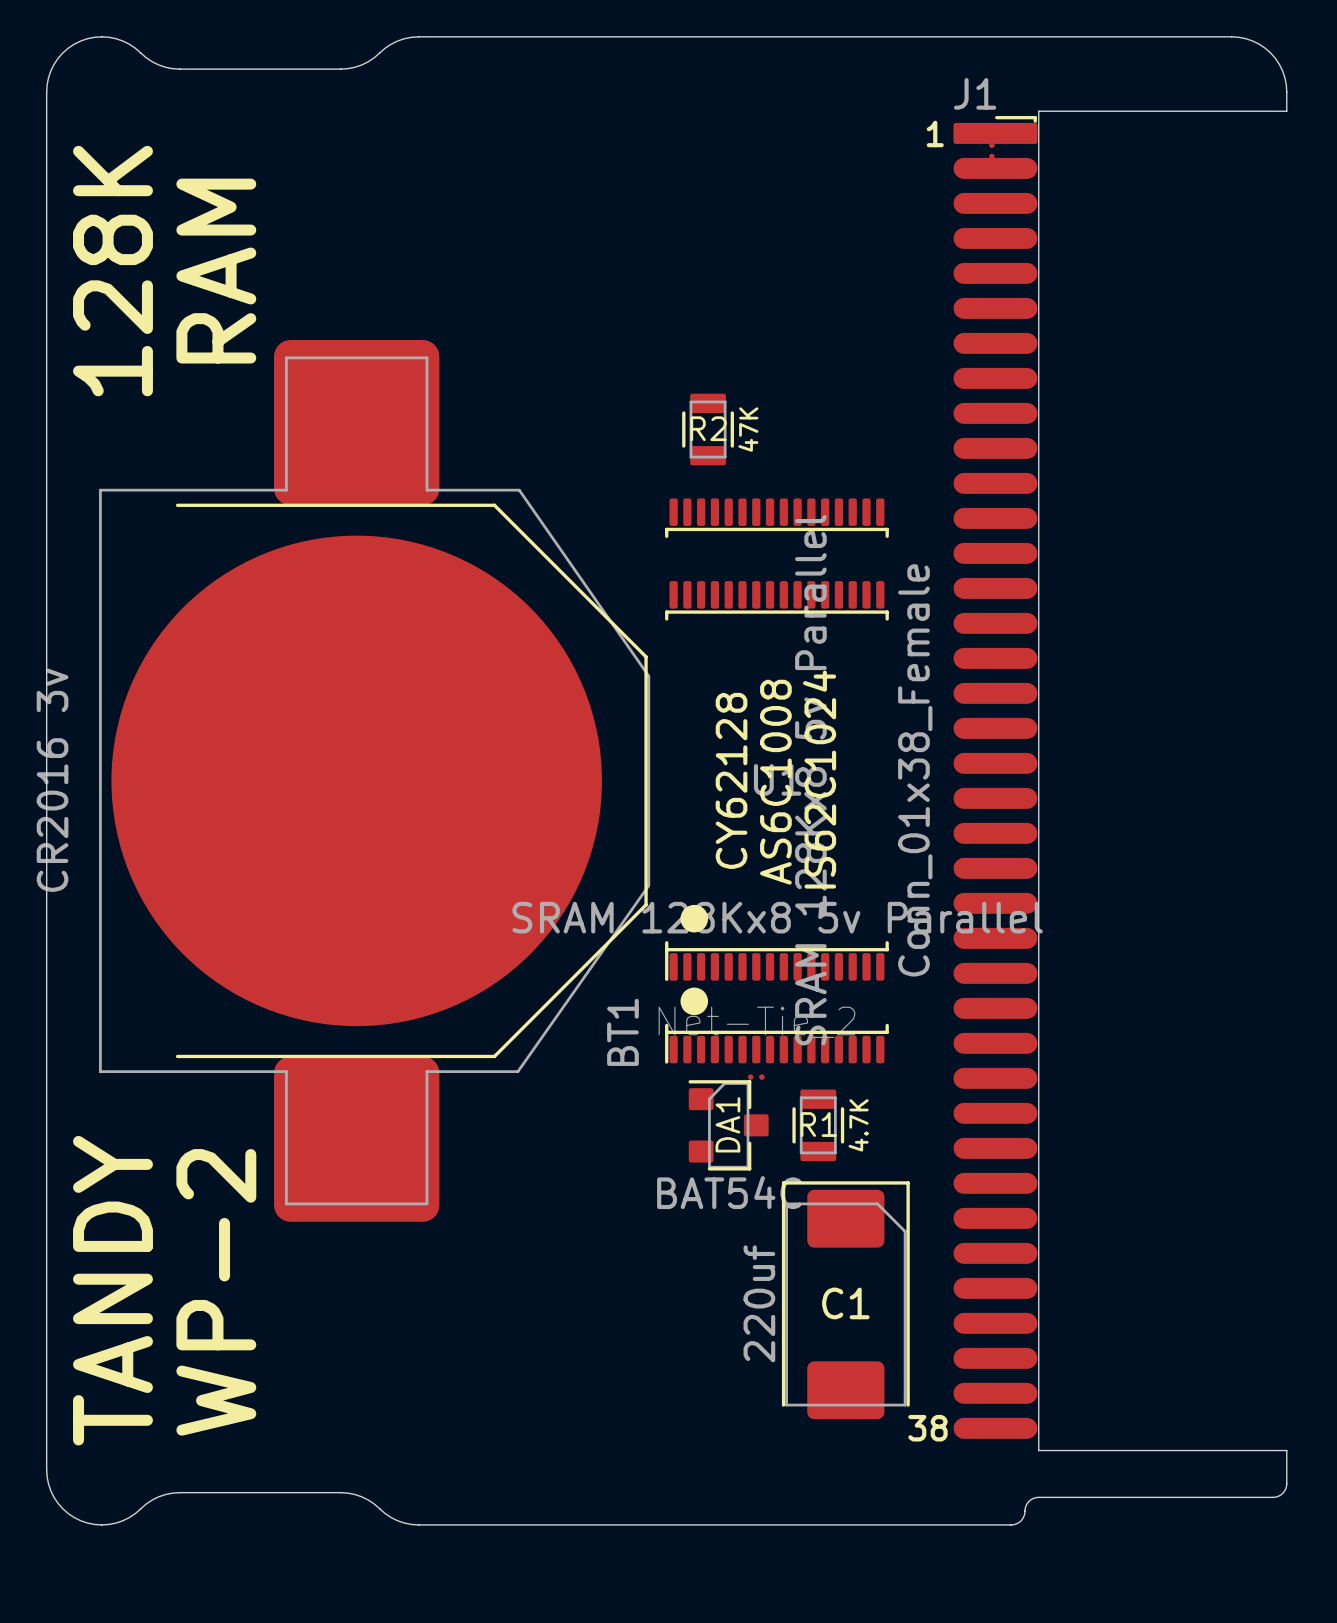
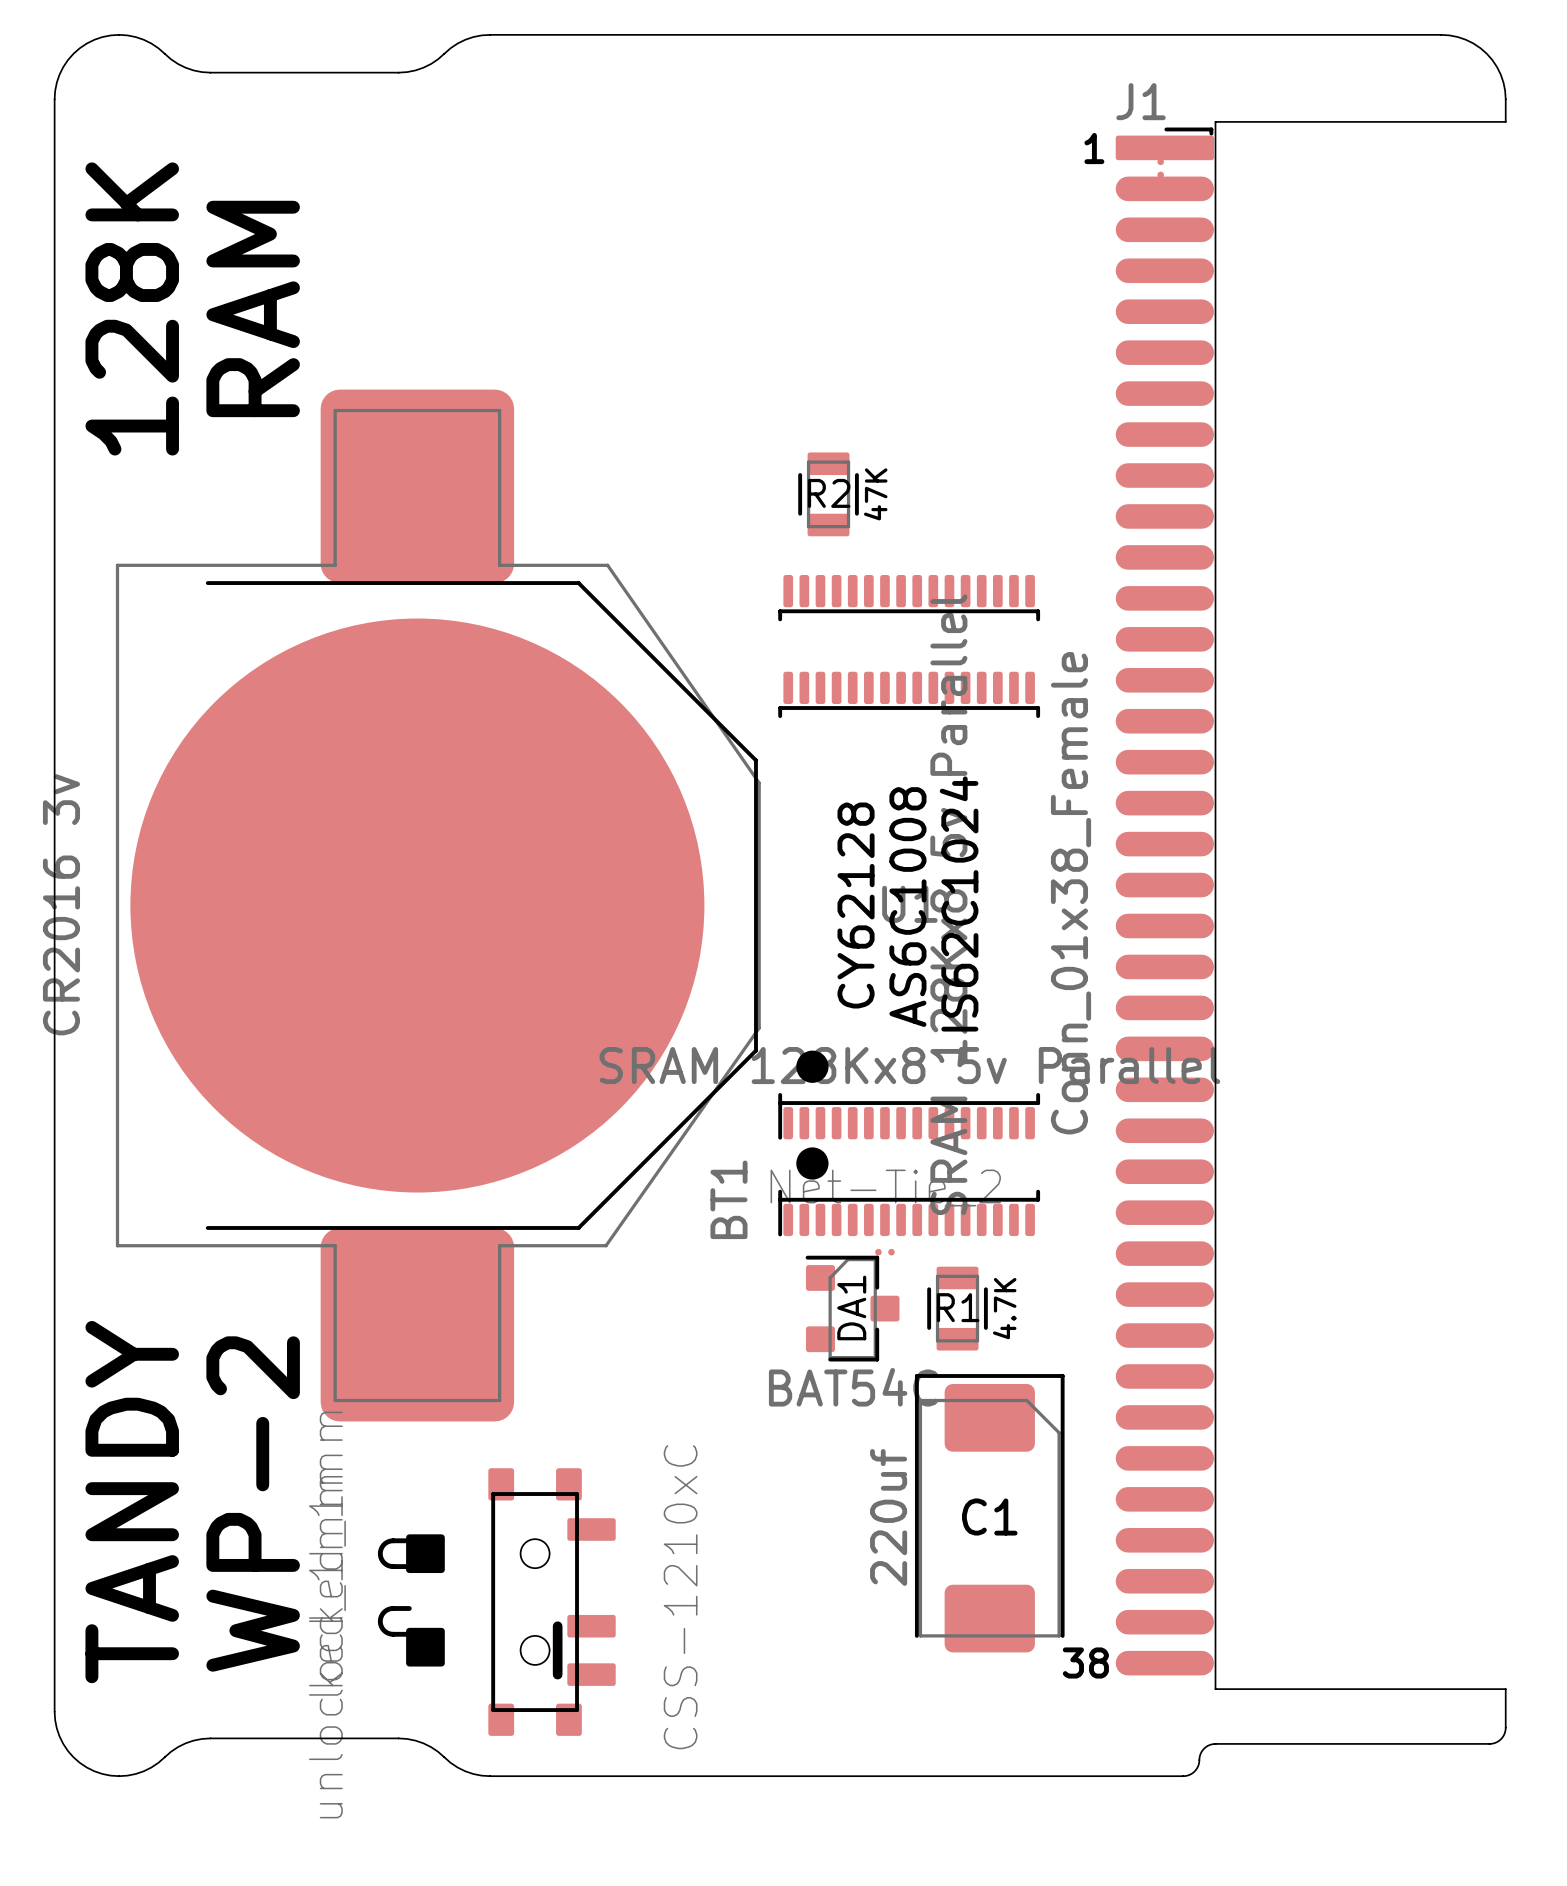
drawing: none -> [377, 1534, 445, 1667]
part: none -> CSS-1210xC (552, 1602)
line: none -> (557, 1626) (557, 1674)

